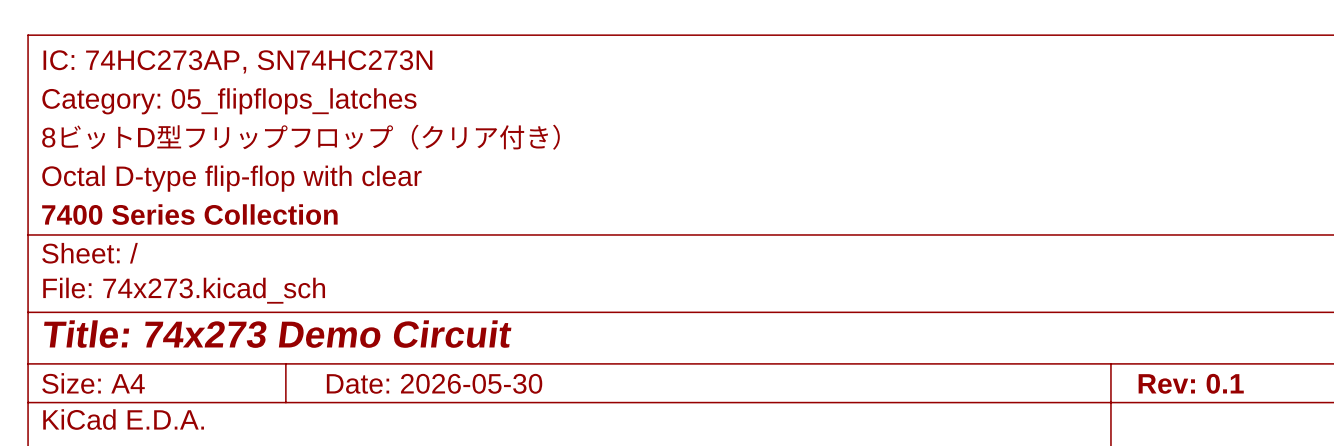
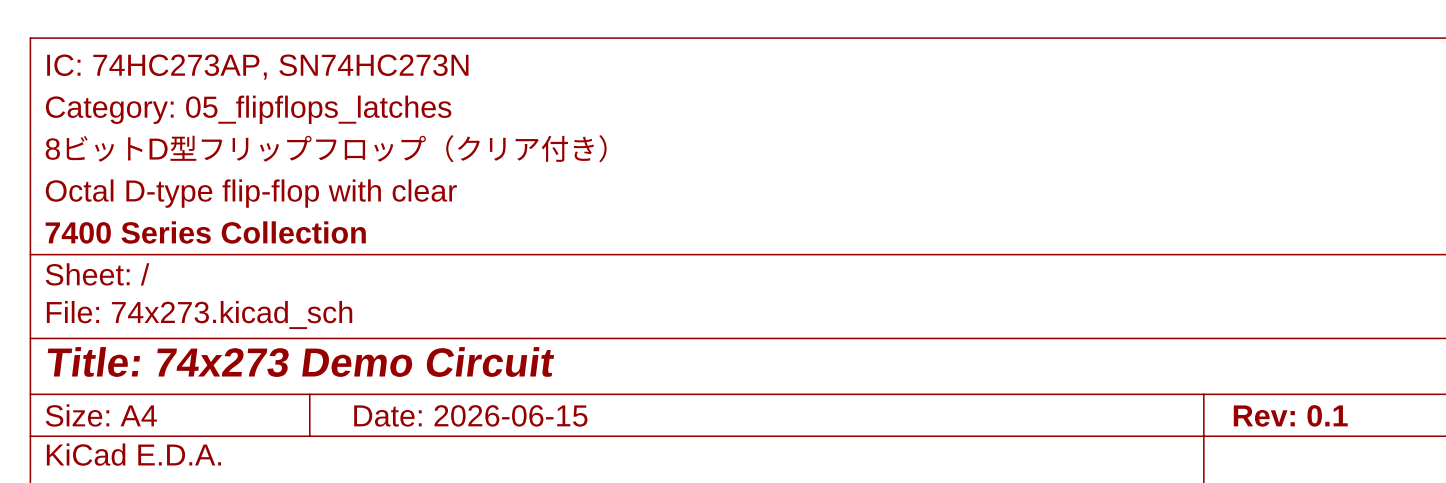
title block: Date: 2026-05-30 (434, 383) -> Date: 2026-06-15 (470, 415)

